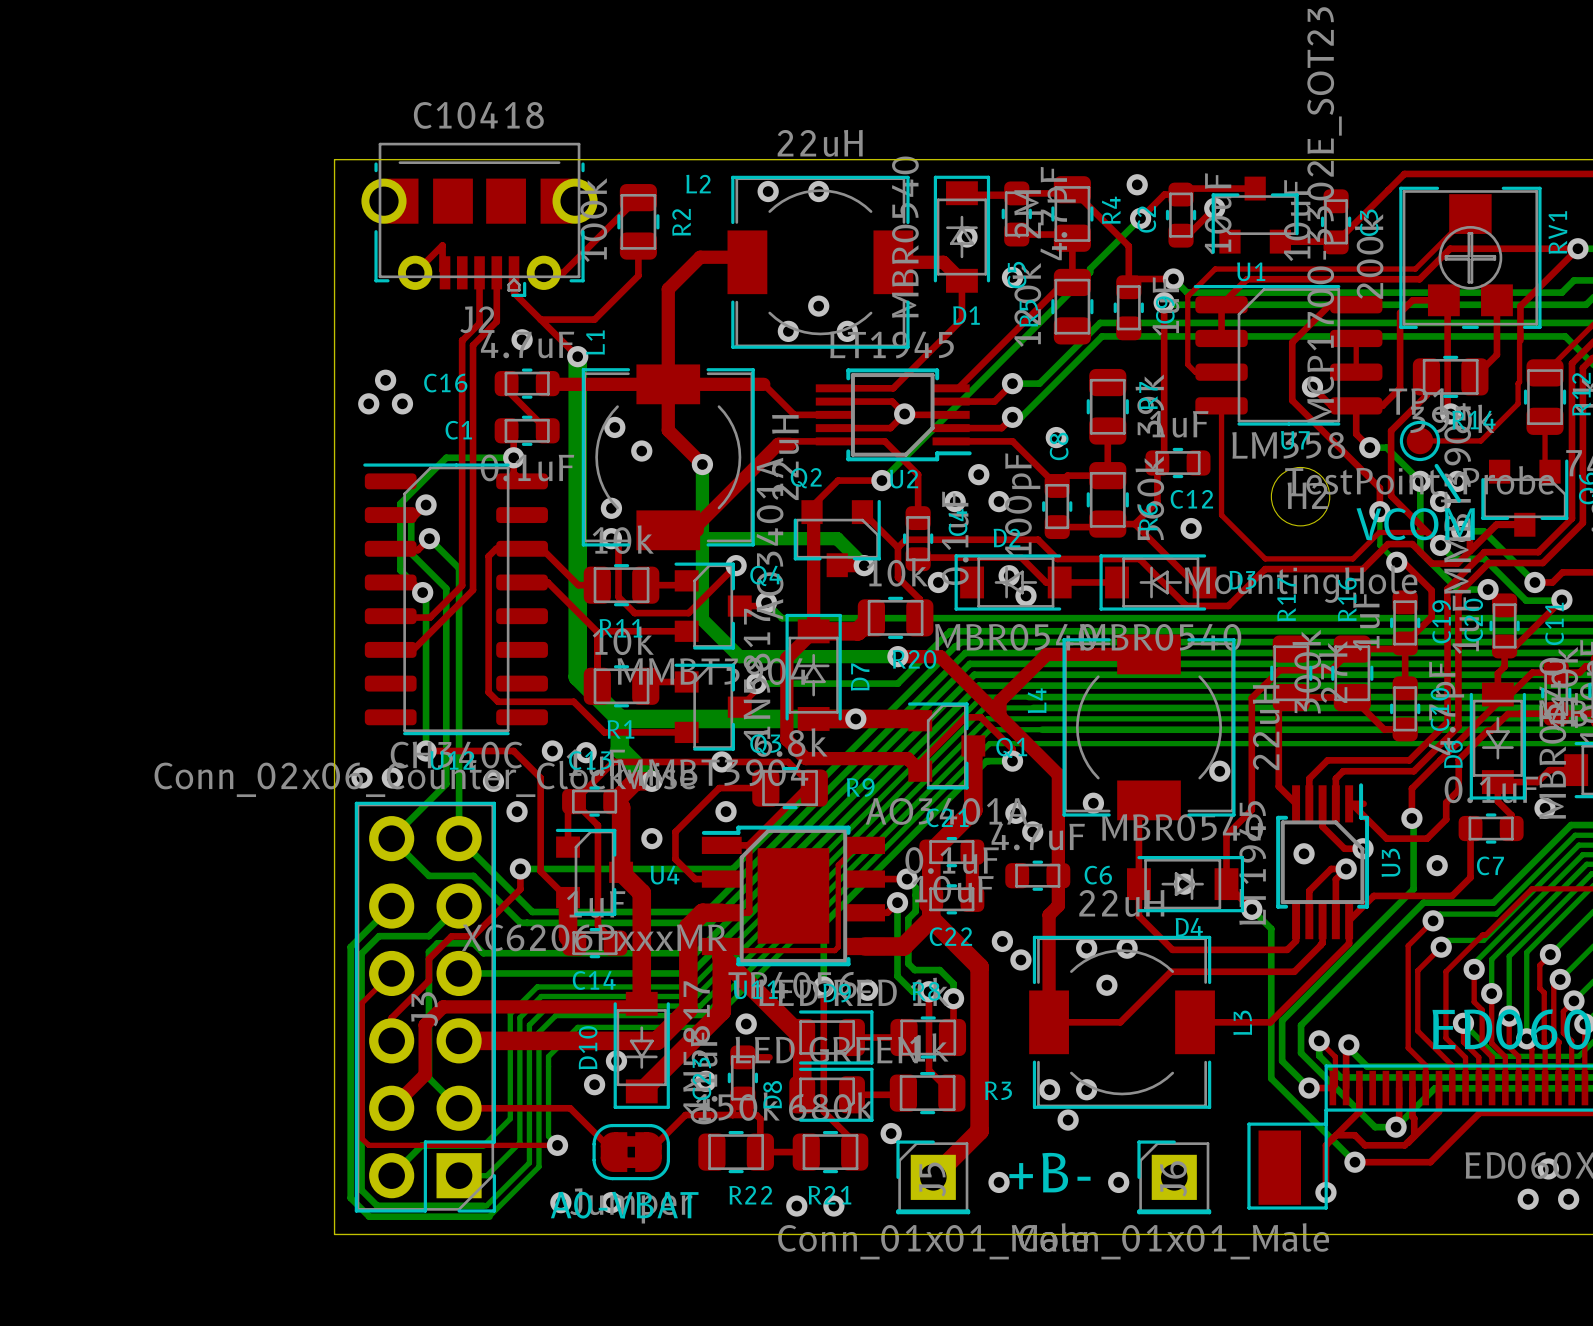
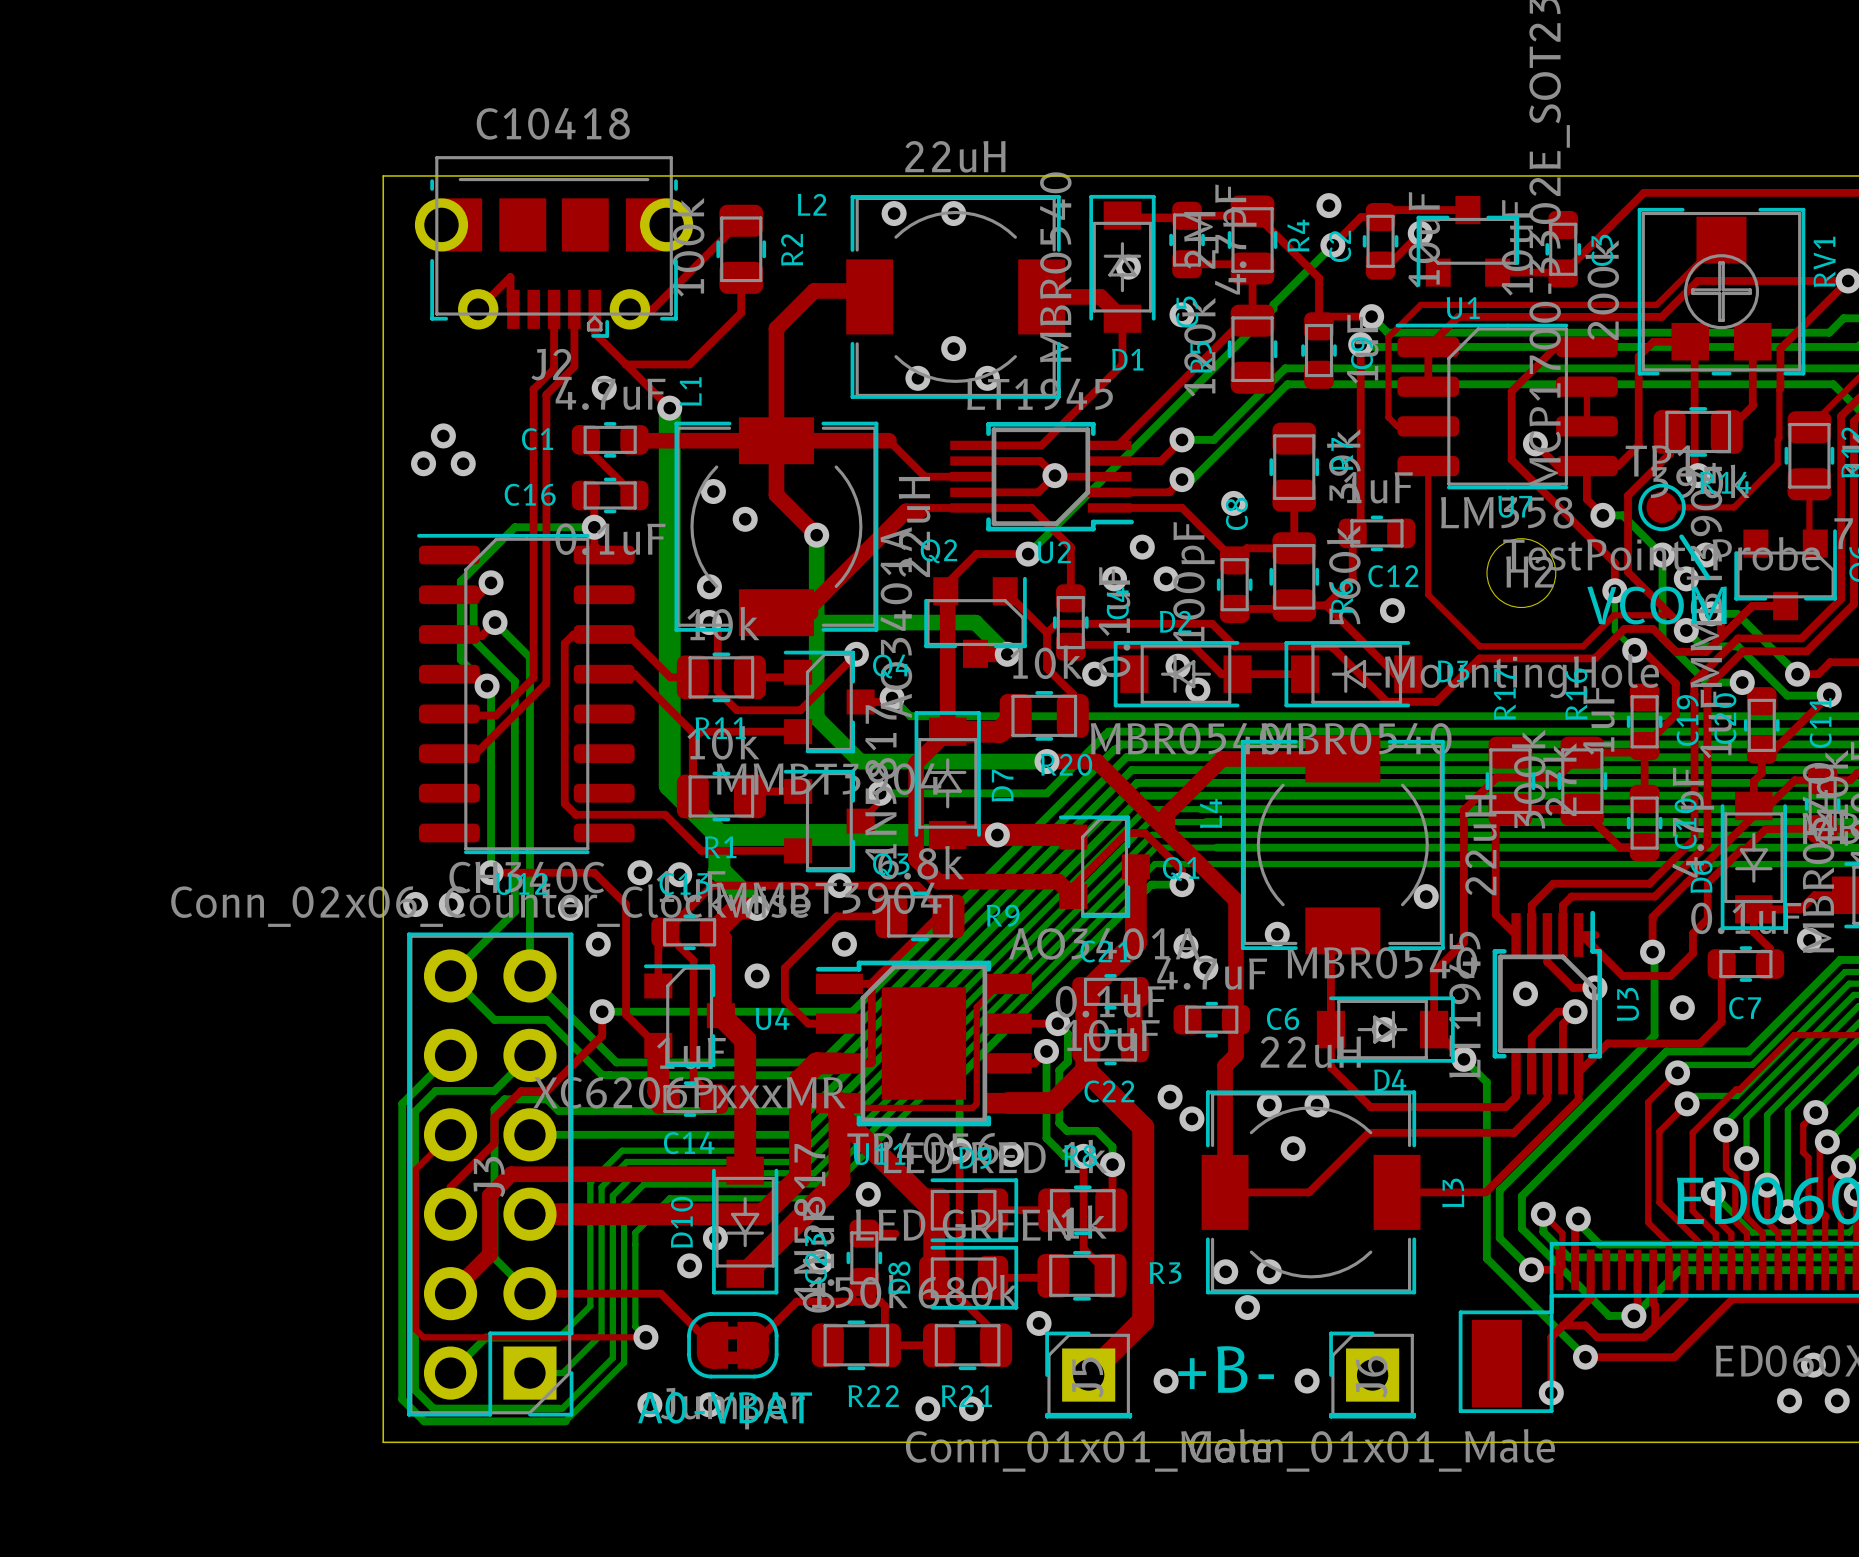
C16 name position: C16 (445, 383) -> C16 (530, 494)
C1 name position: C1 (458, 430) -> C1 (537, 439)

